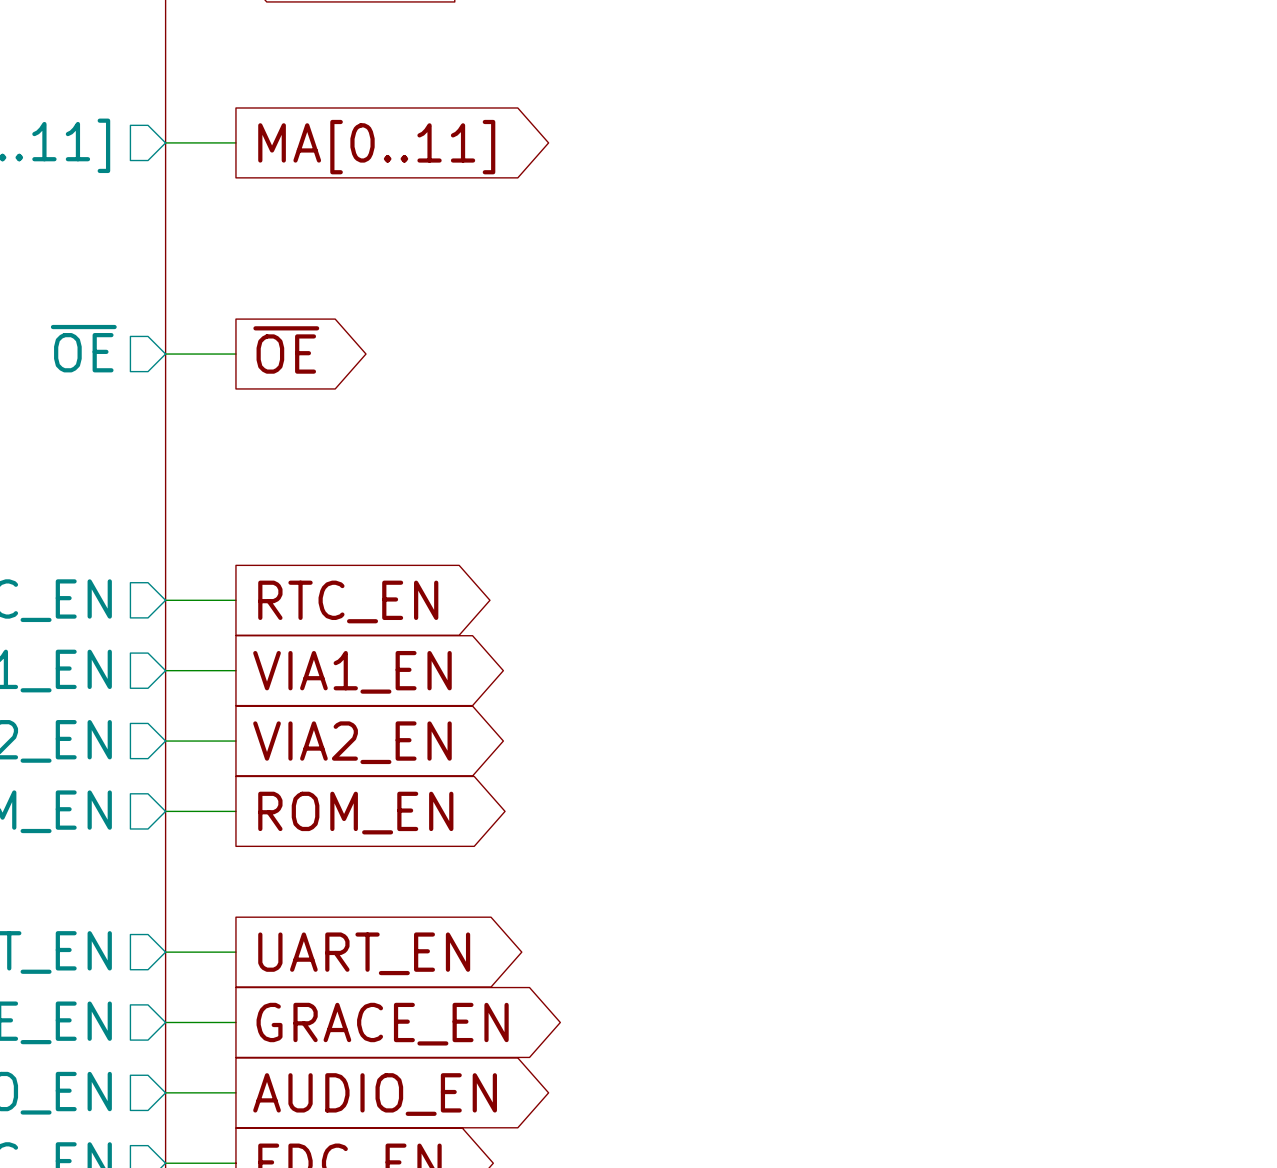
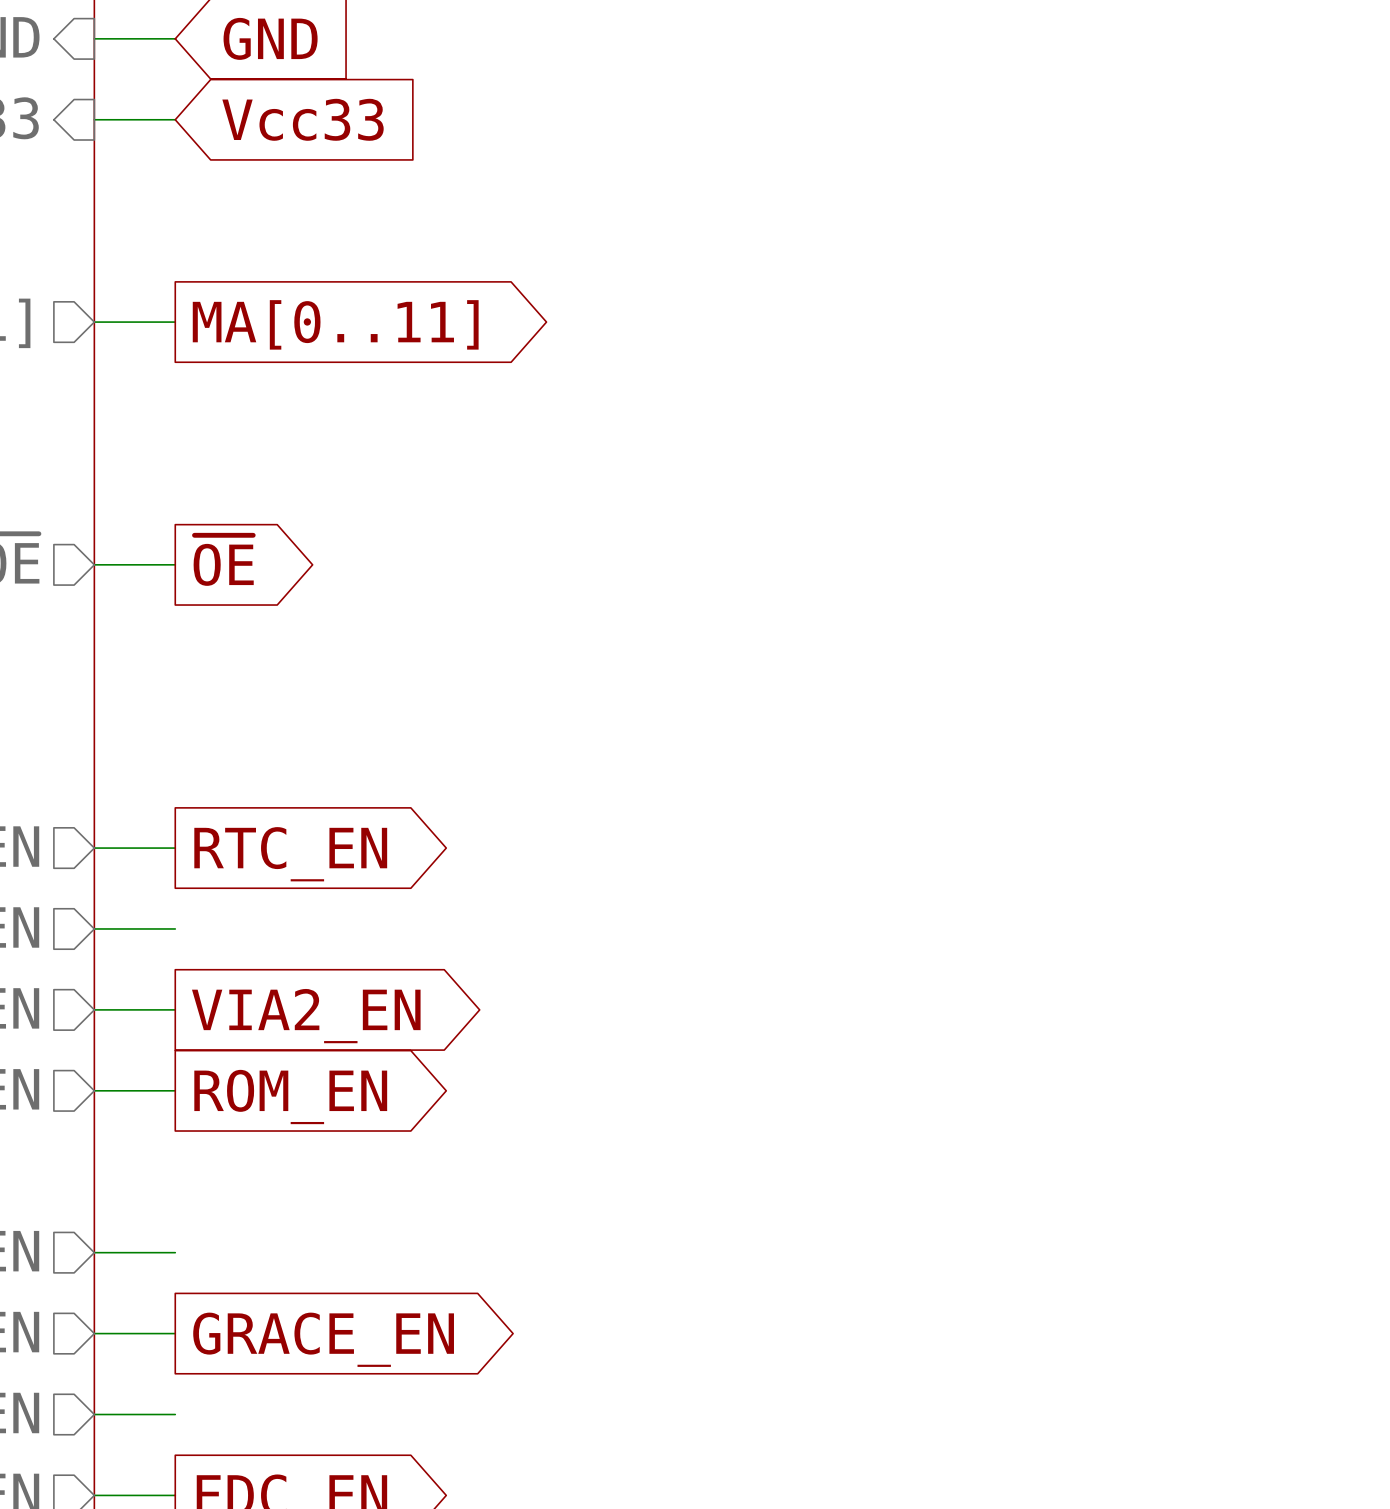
global label: VIA1_EN (352, 672) -> none
global label: UART_EN (364, 953) -> none
global label: AUDIO_EN (375, 1094) -> none

